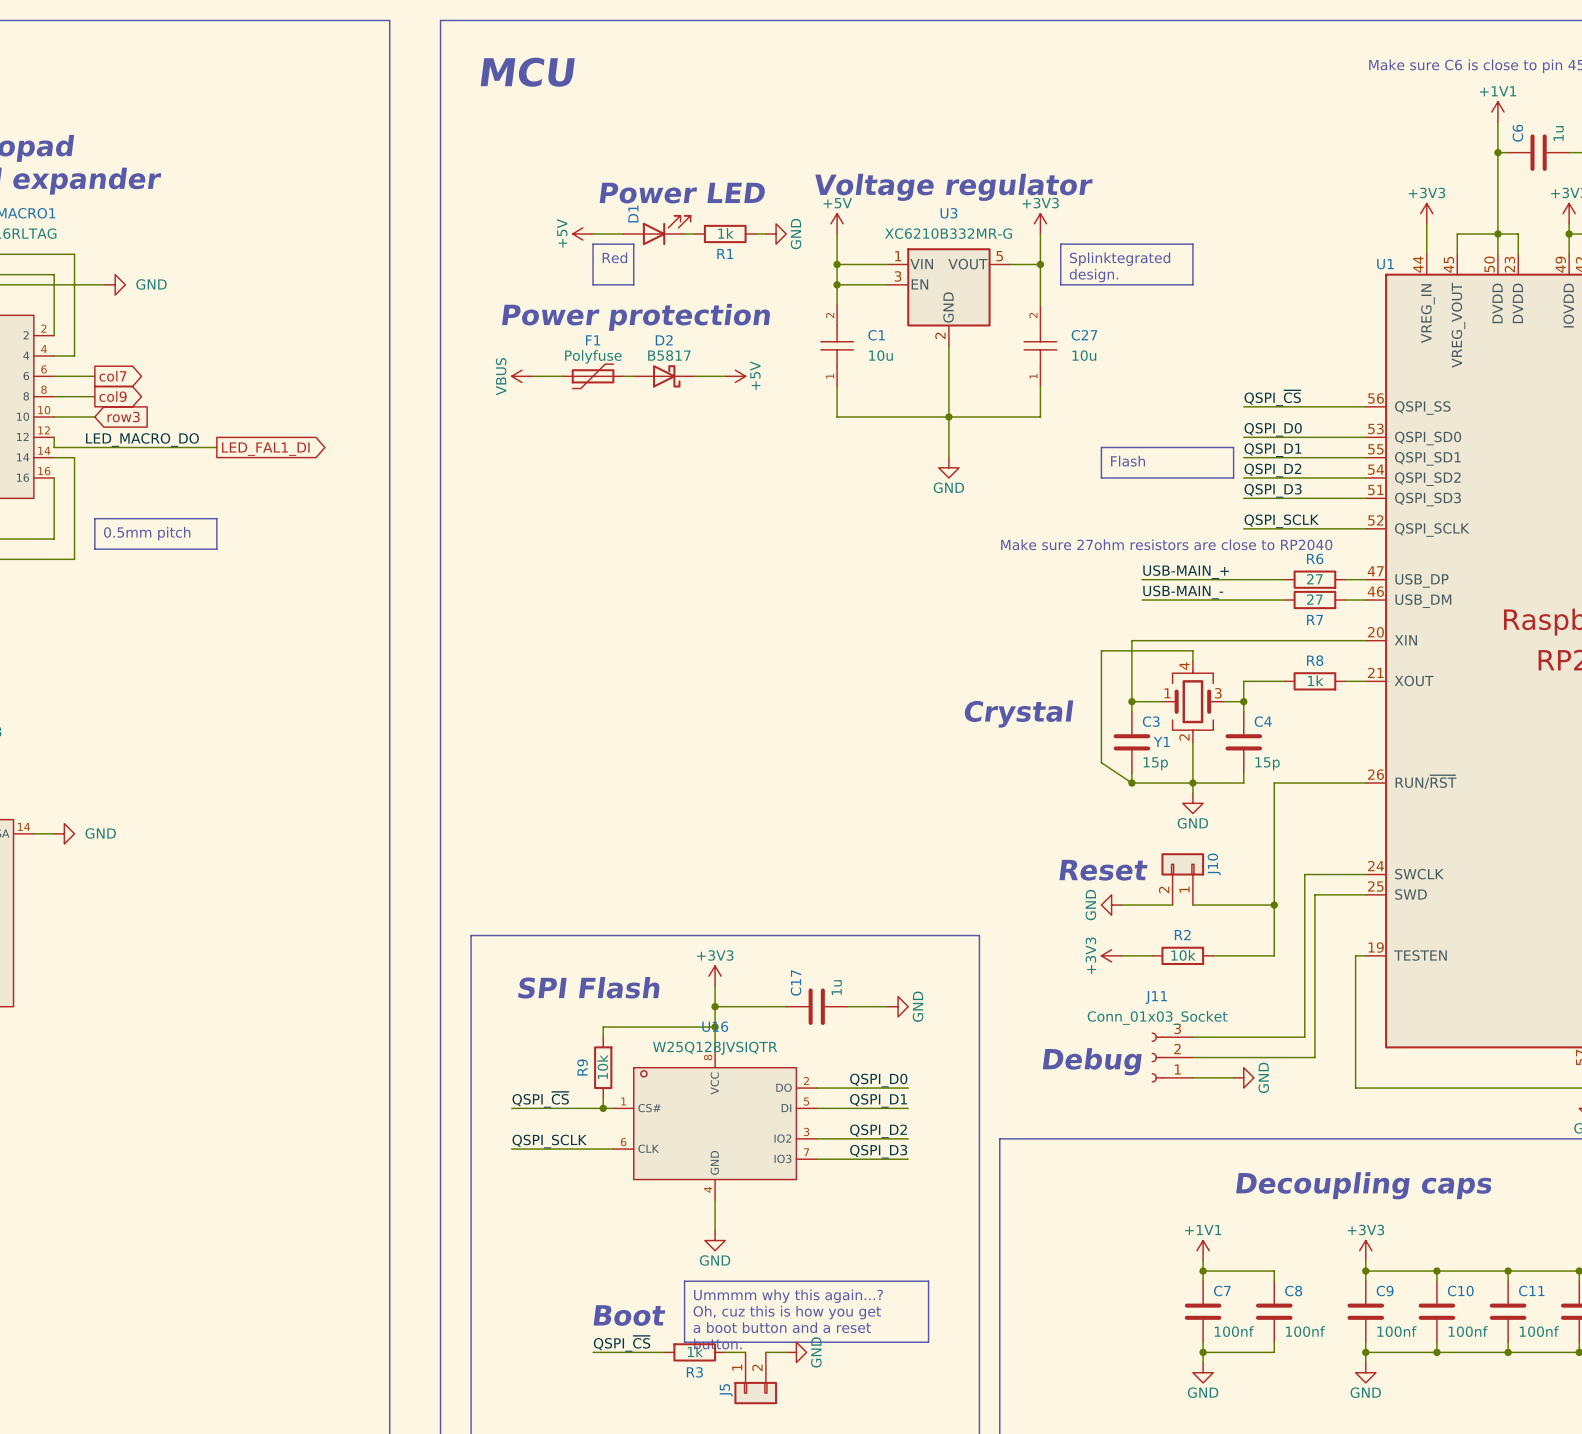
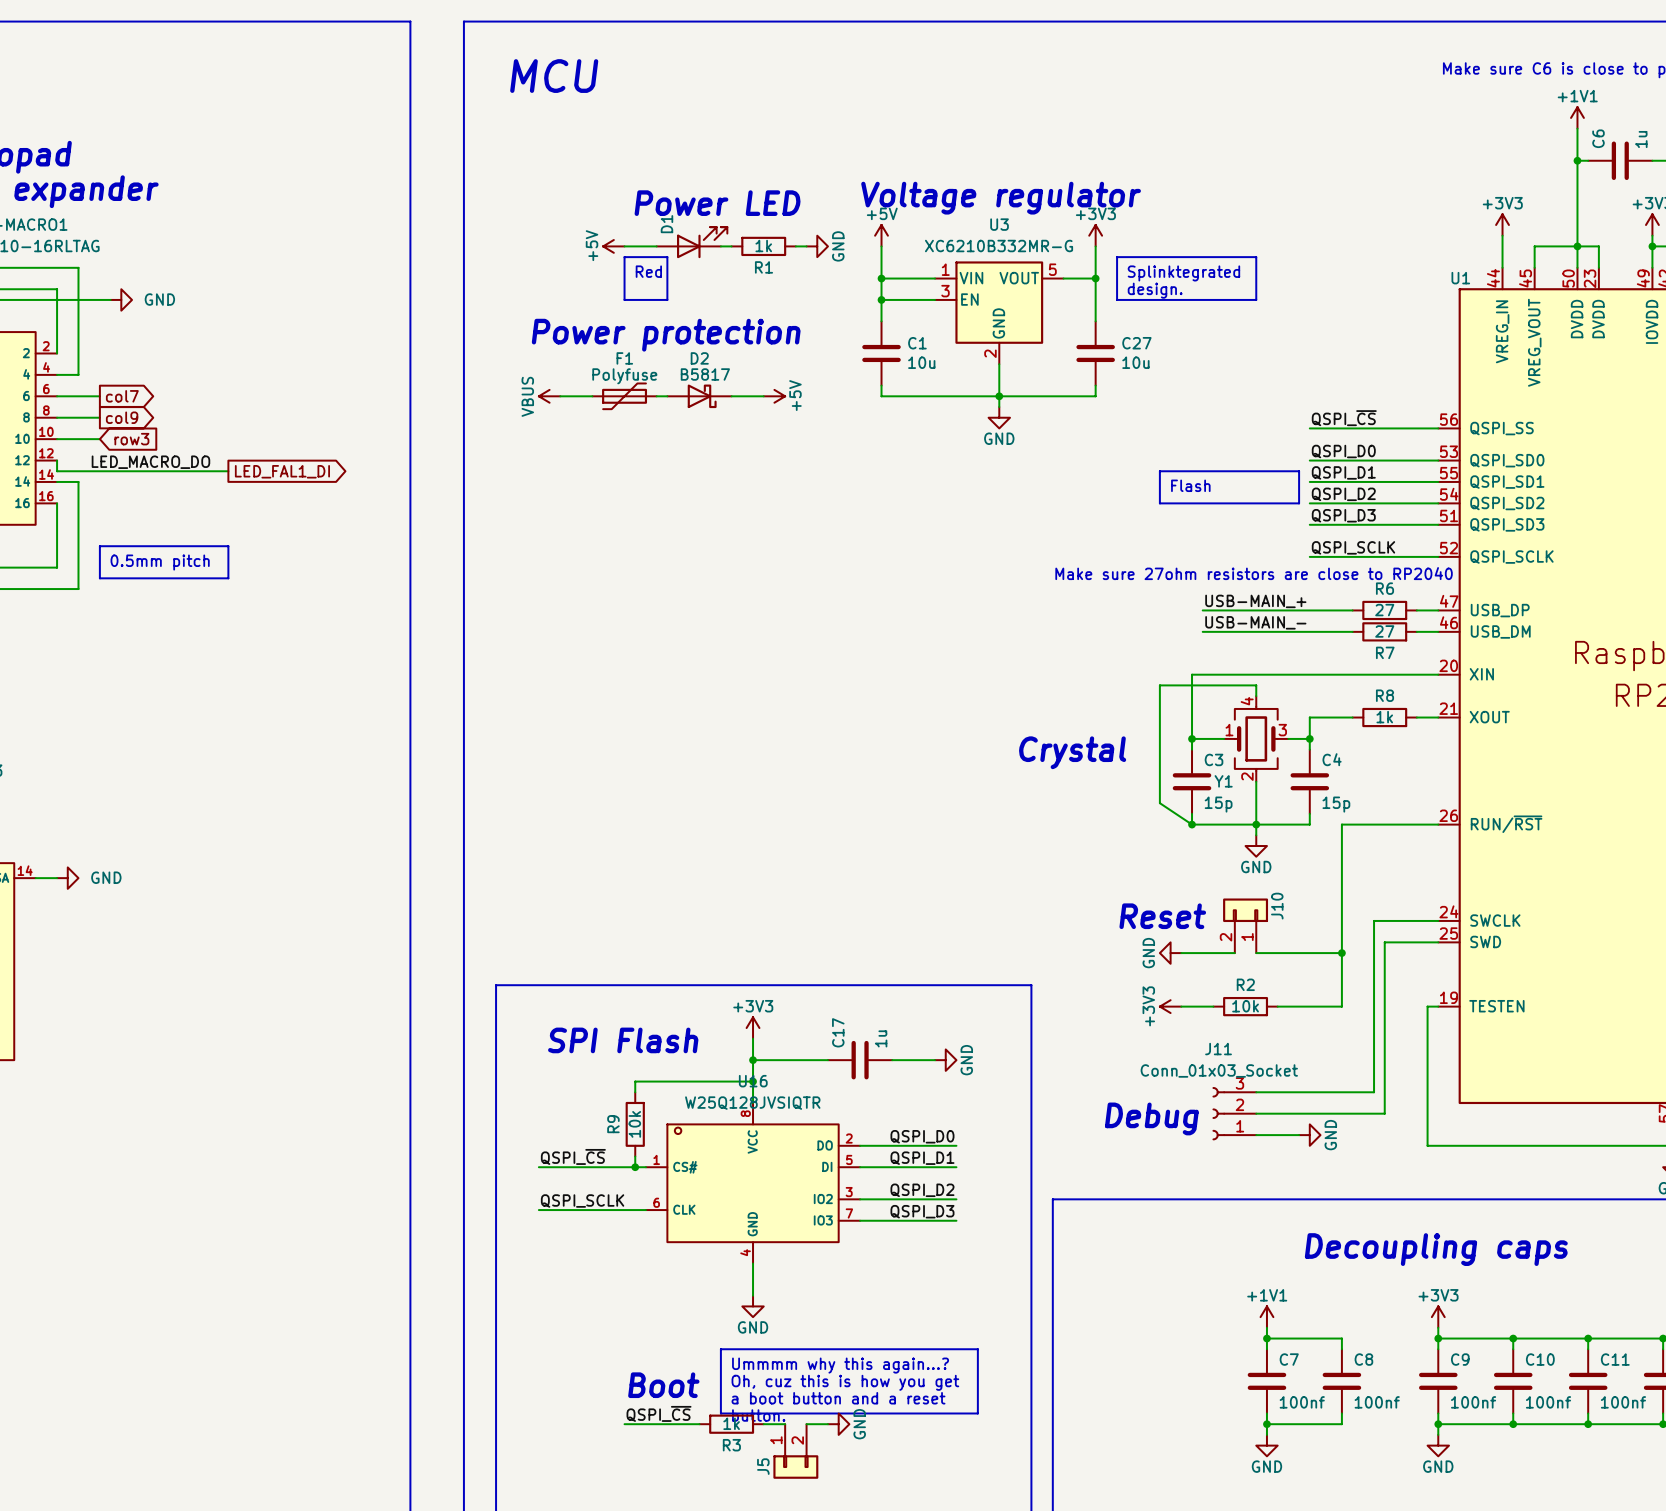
C1 symbol: [820, 305, 854, 387] -> [862, 321, 901, 386]
C27 symbol: [1024, 305, 1057, 387] -> [1076, 321, 1115, 386]
wire: none -> (881, 385) (881, 396) (1095, 396) (1095, 385)
wire: (837, 386) (837, 417) (1040, 417) (1040, 386) -> none
wire: (948, 386) (948, 457) -> none
junction position: (948, 417) -> (999, 396)
power symbol position: GND (948, 467) -> GND (999, 417)

